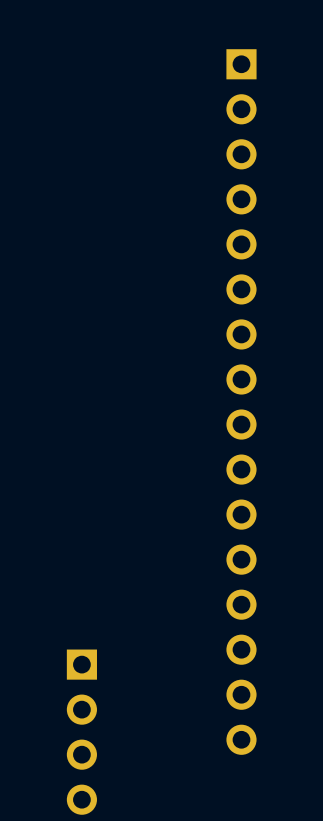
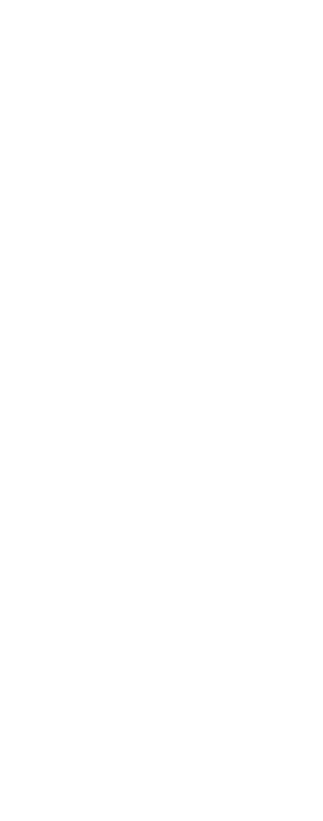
part: (241, 402) -> none
part: (81, 732) -> none

